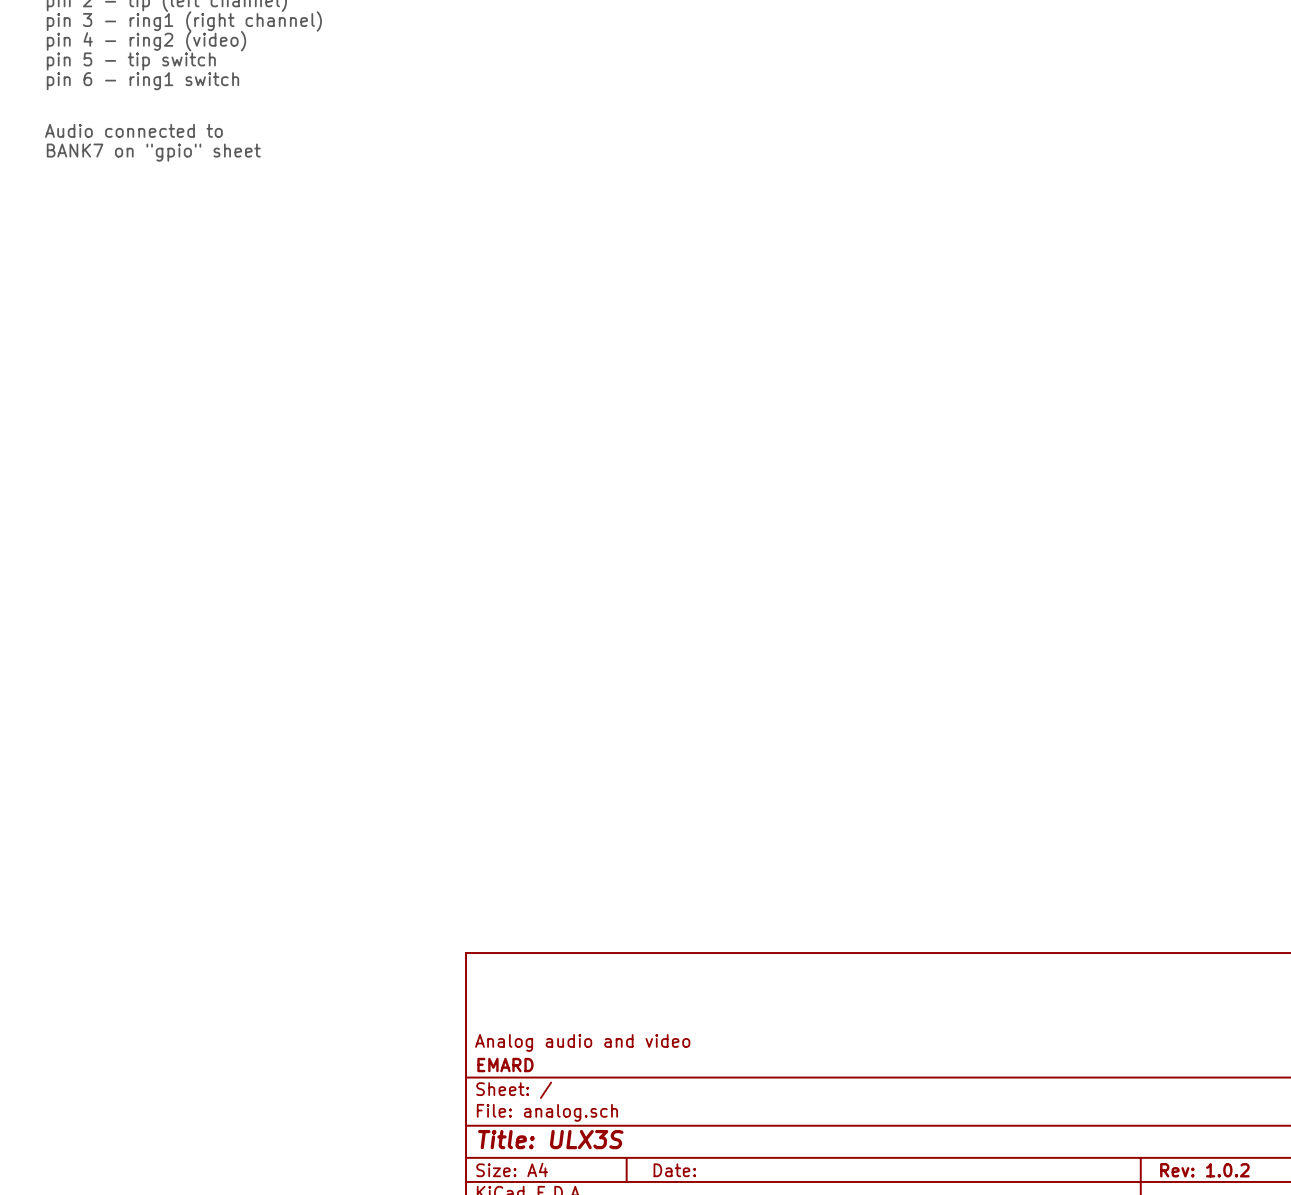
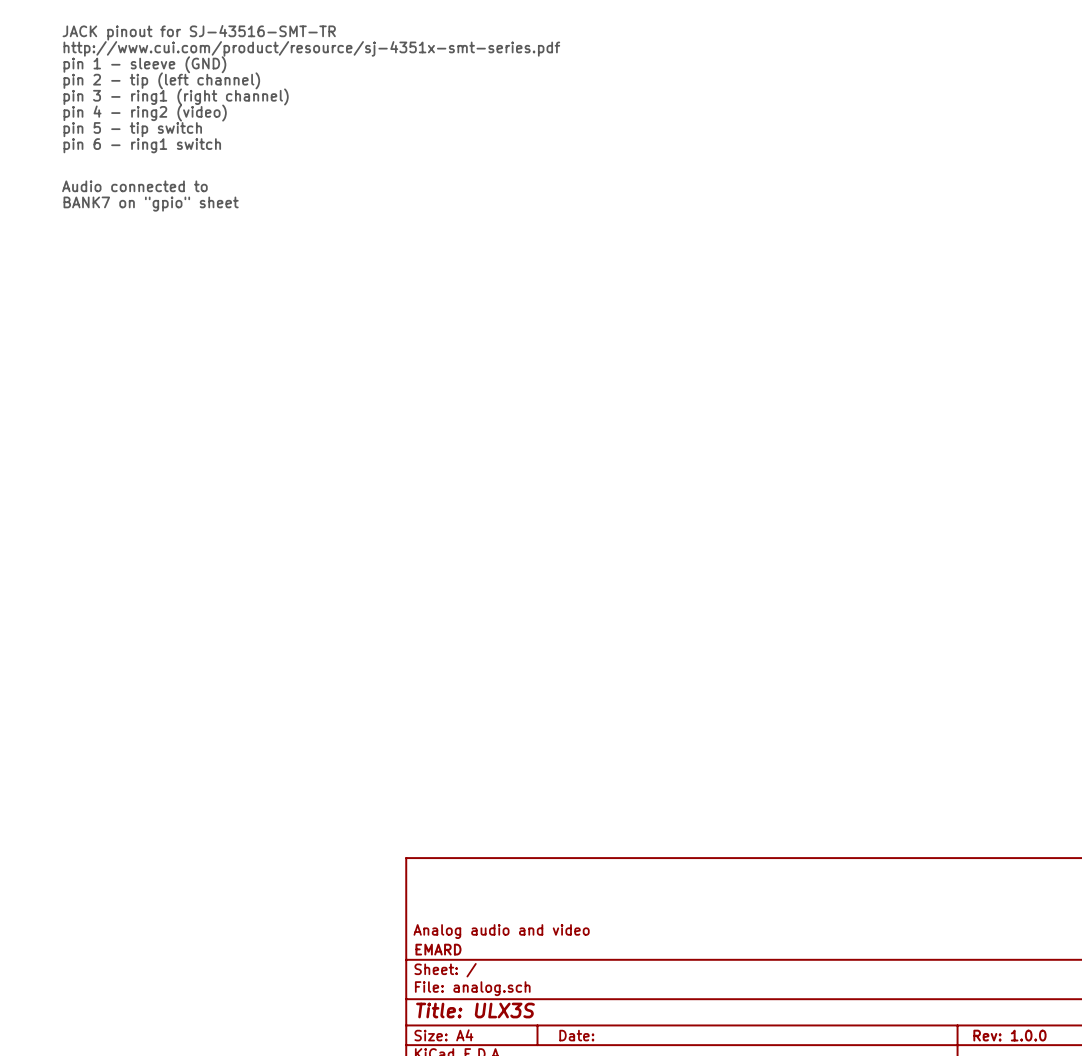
title block: Rev: 1.0.2 (1204, 1170) -> Rev: 1.0.0 (1009, 1035)

